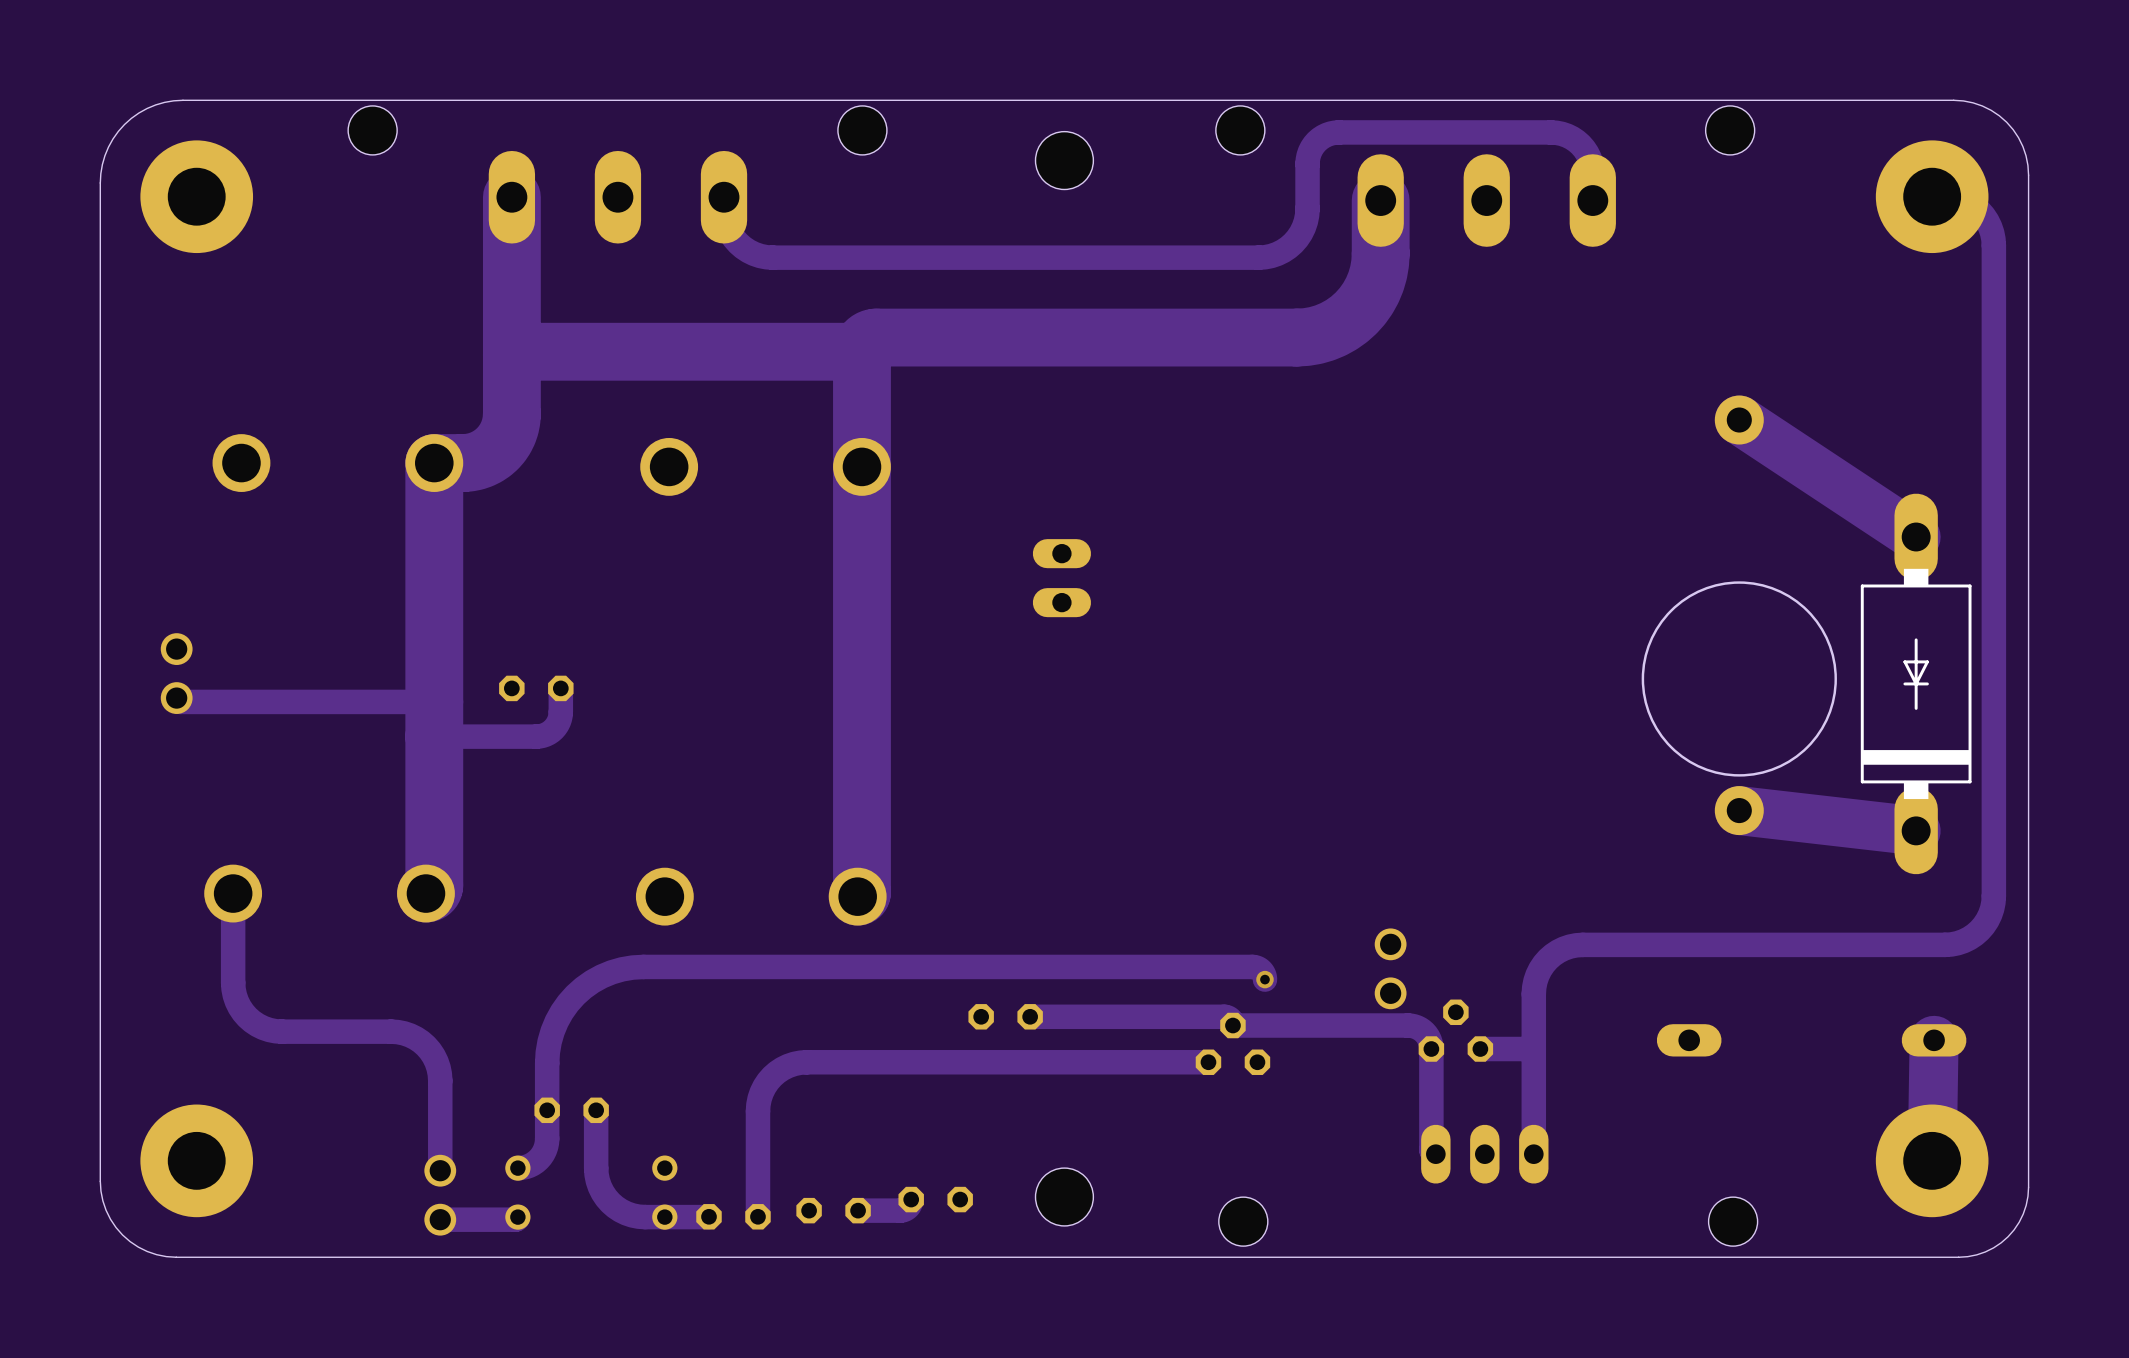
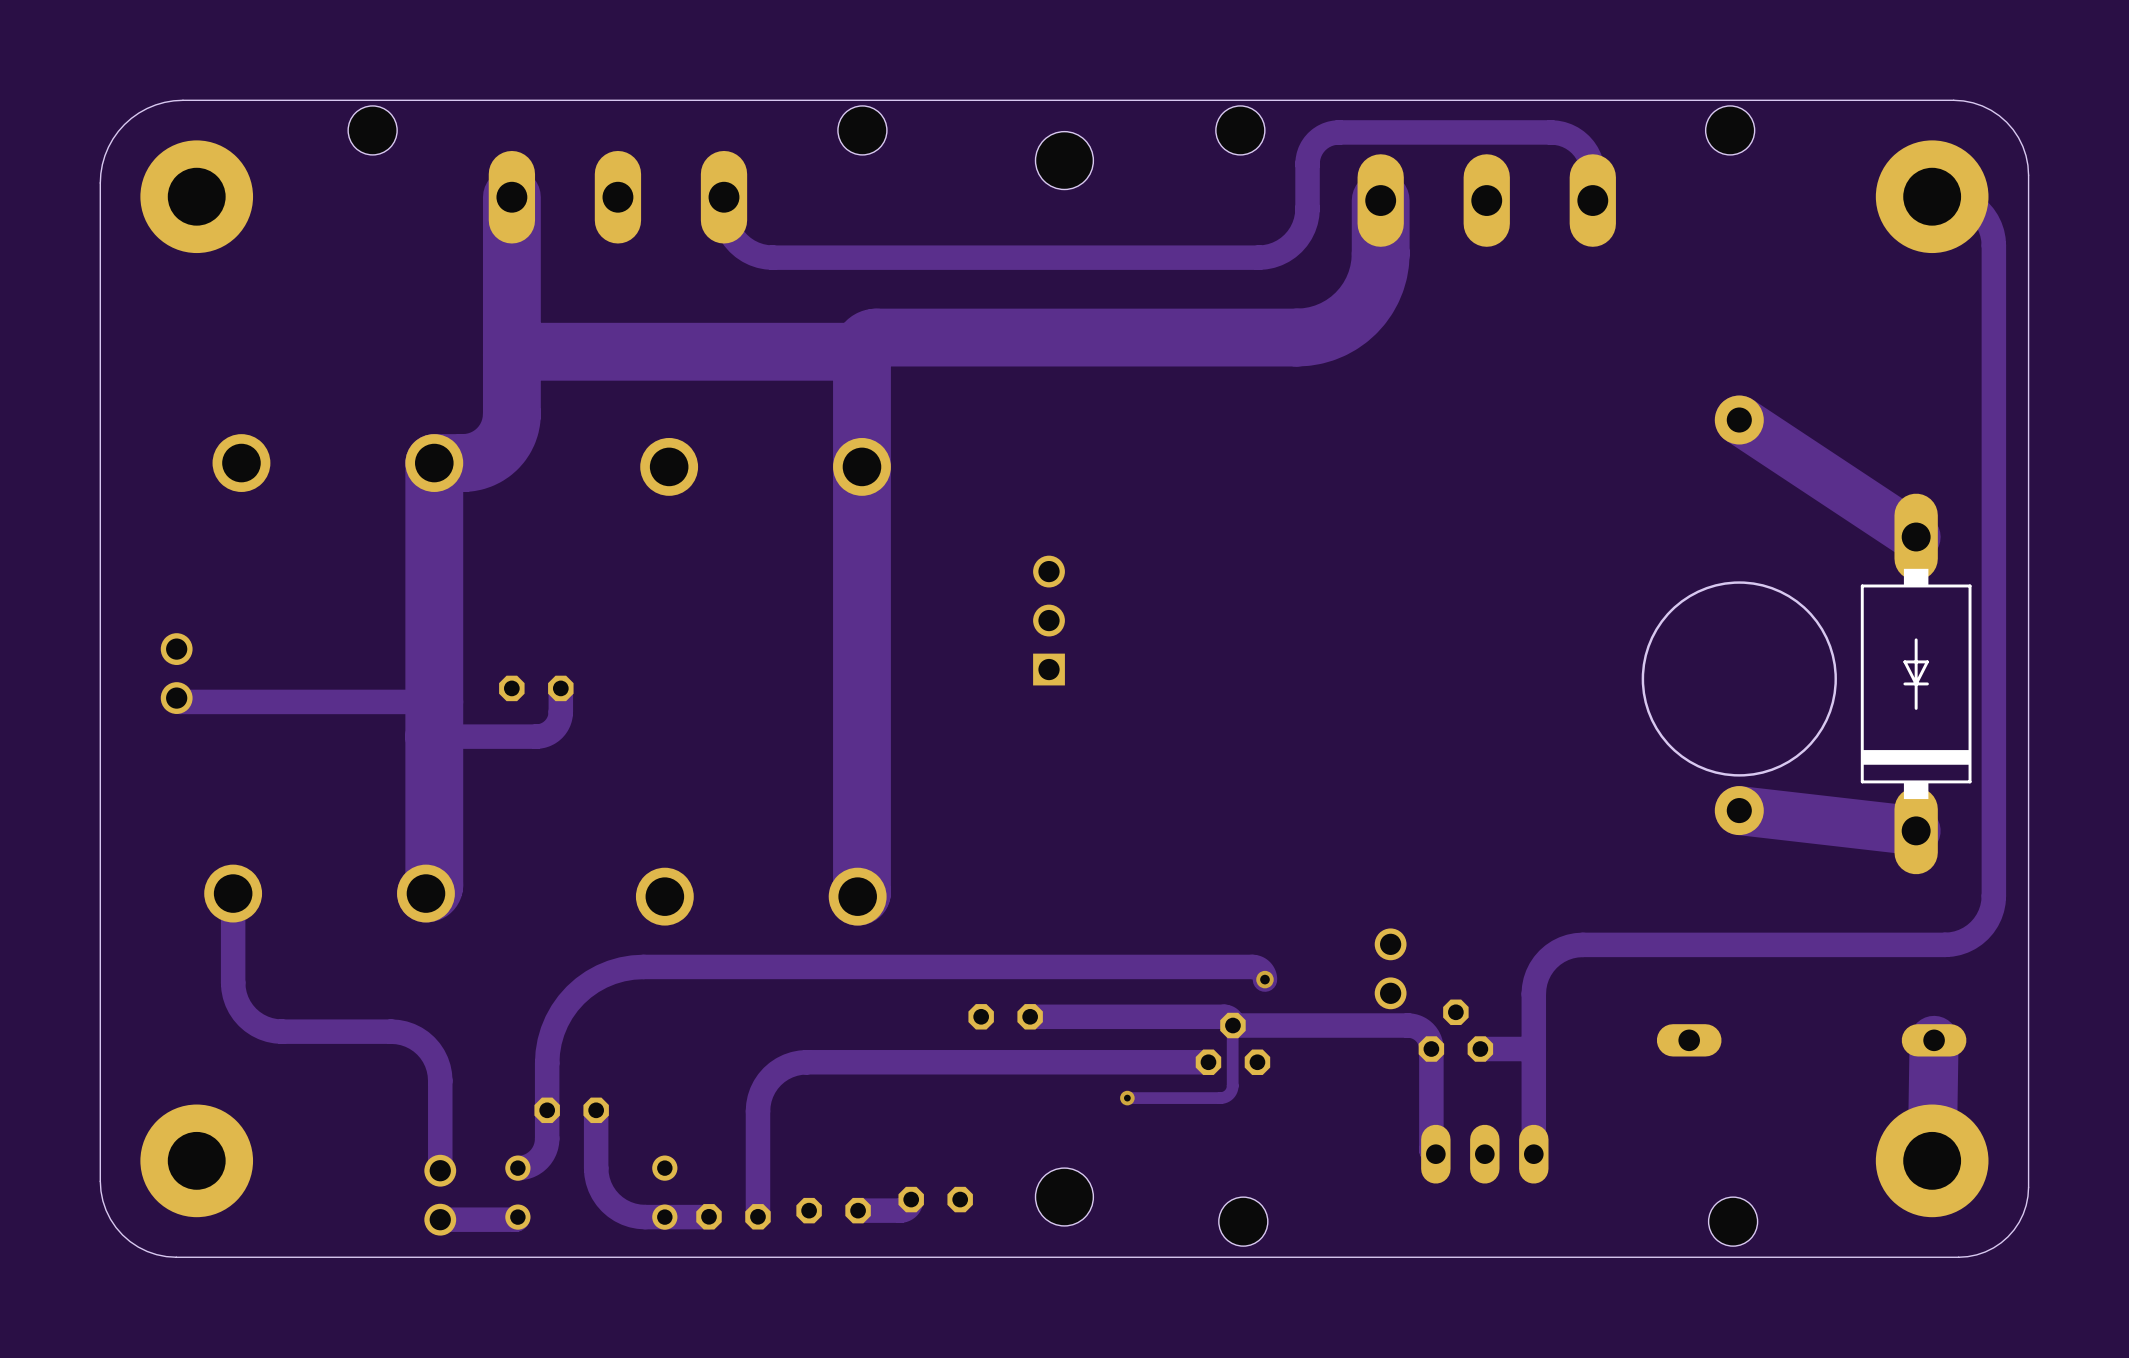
part: (1061, 578) -> none
part: none -> (1049, 620)
track: none -> (1232, 1025) (1232, 1087) (1227, 1095) (1220, 1098) (1127, 1098)
via: none -> (1127, 1098)

